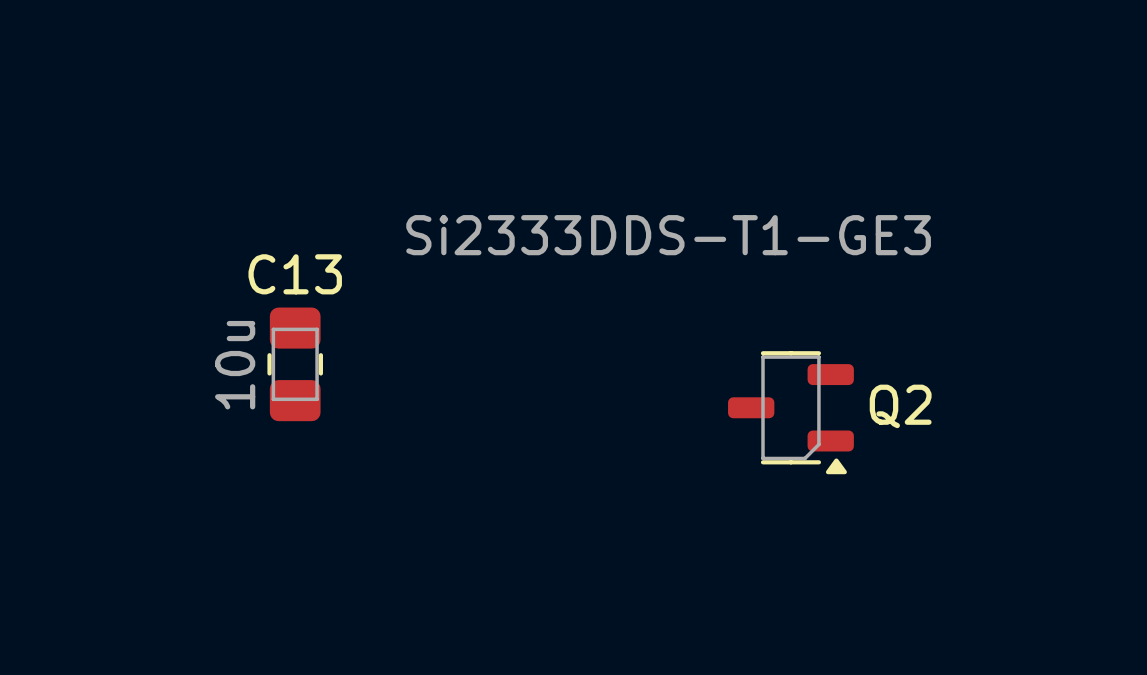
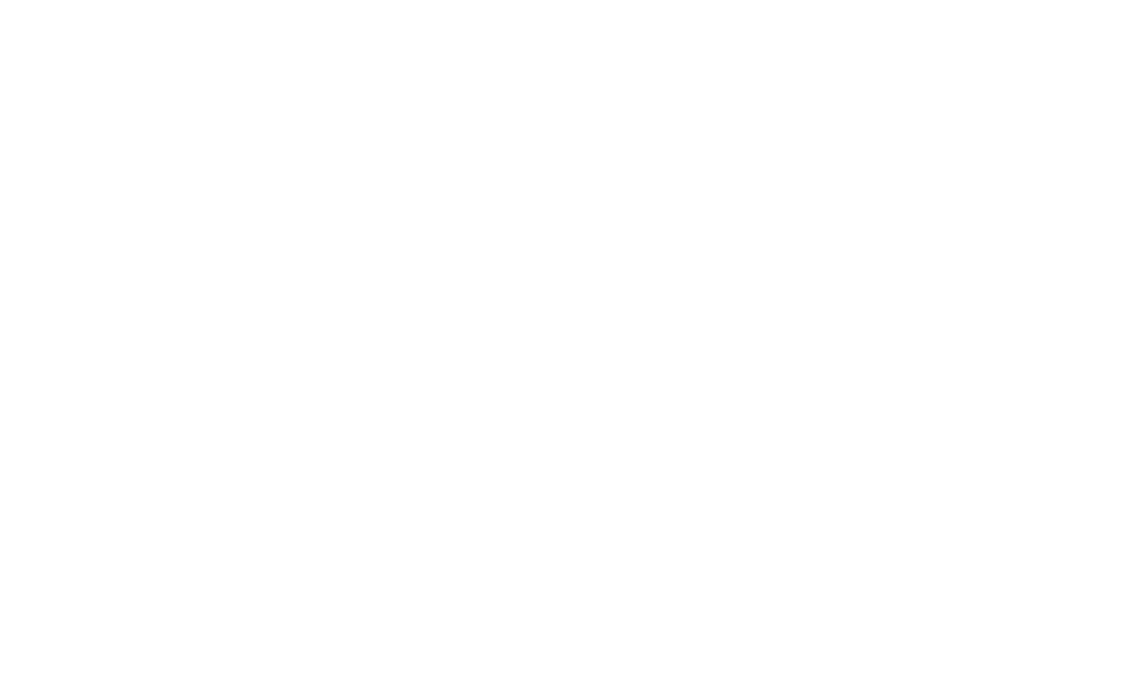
C13: 10u (295, 364) -> none
Q2: Si2333DDS-T1-GE3 (790, 412) -> none

